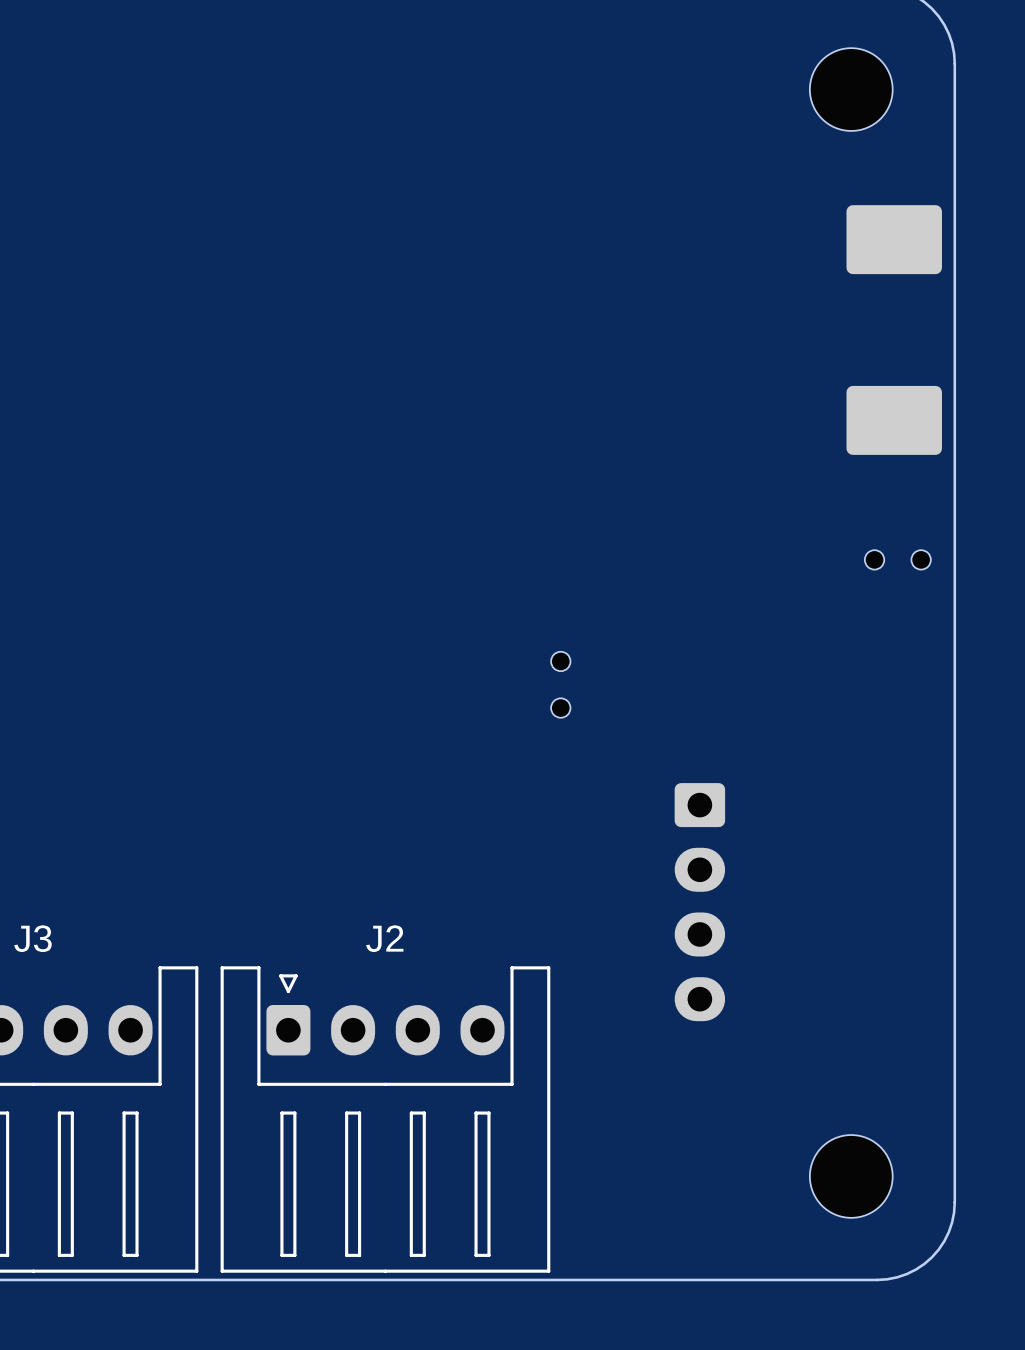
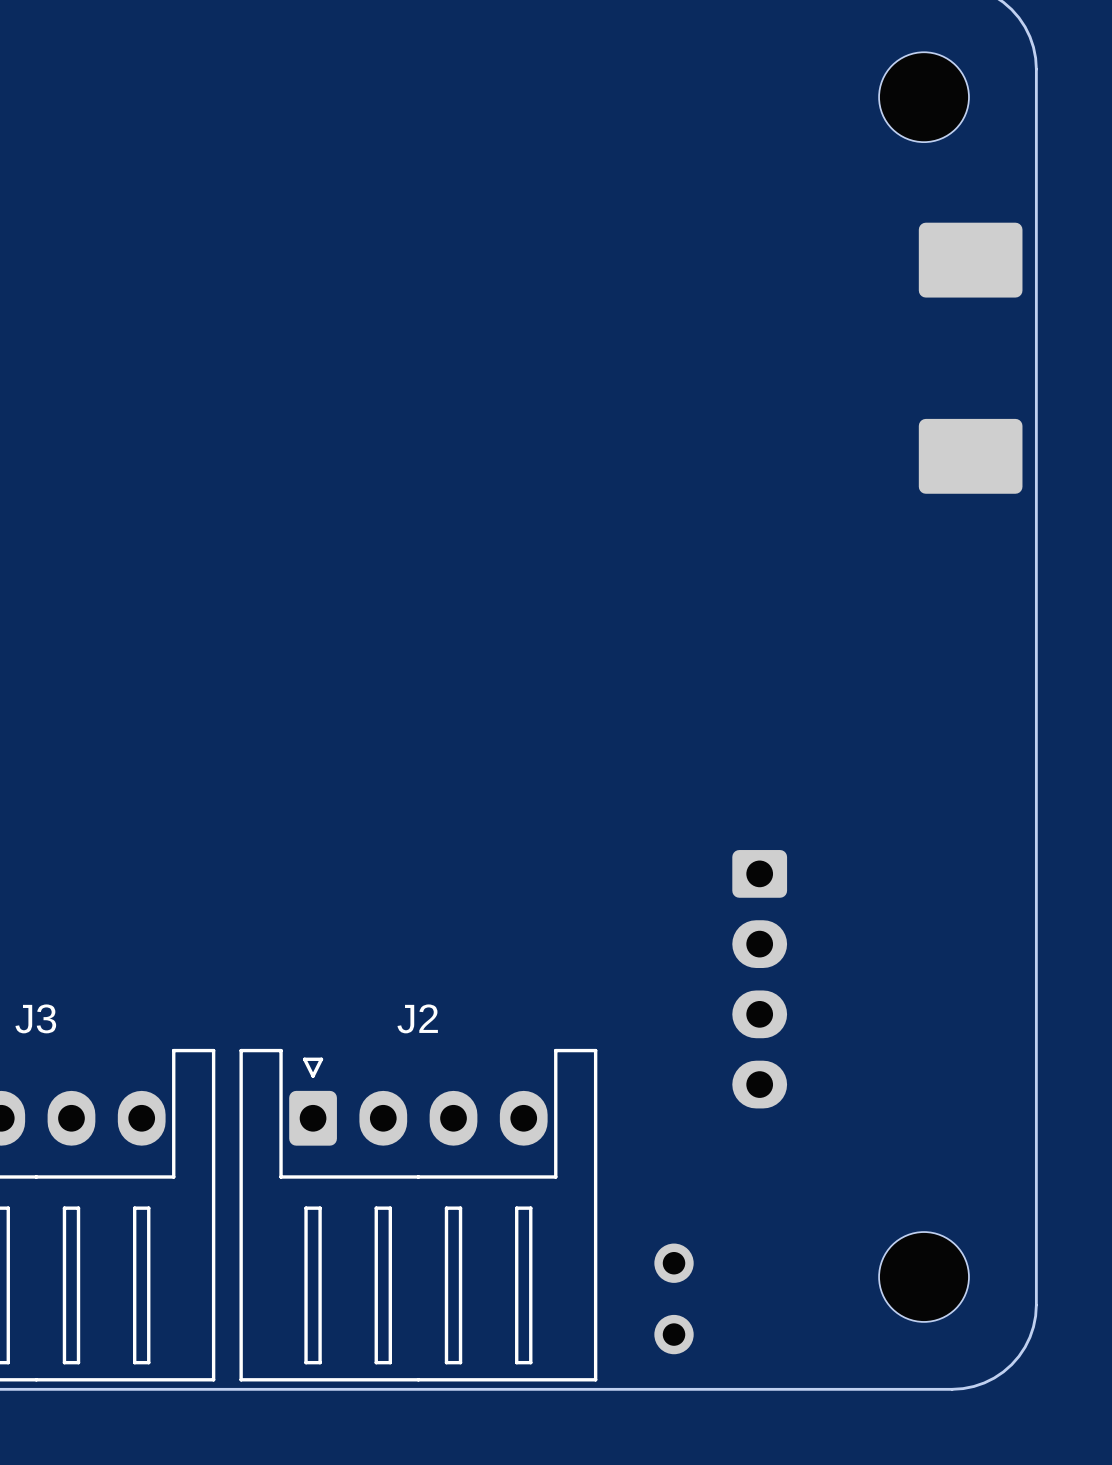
part: (897, 559) -> none
part: (560, 684) -> none
part: none -> (674, 1298)

